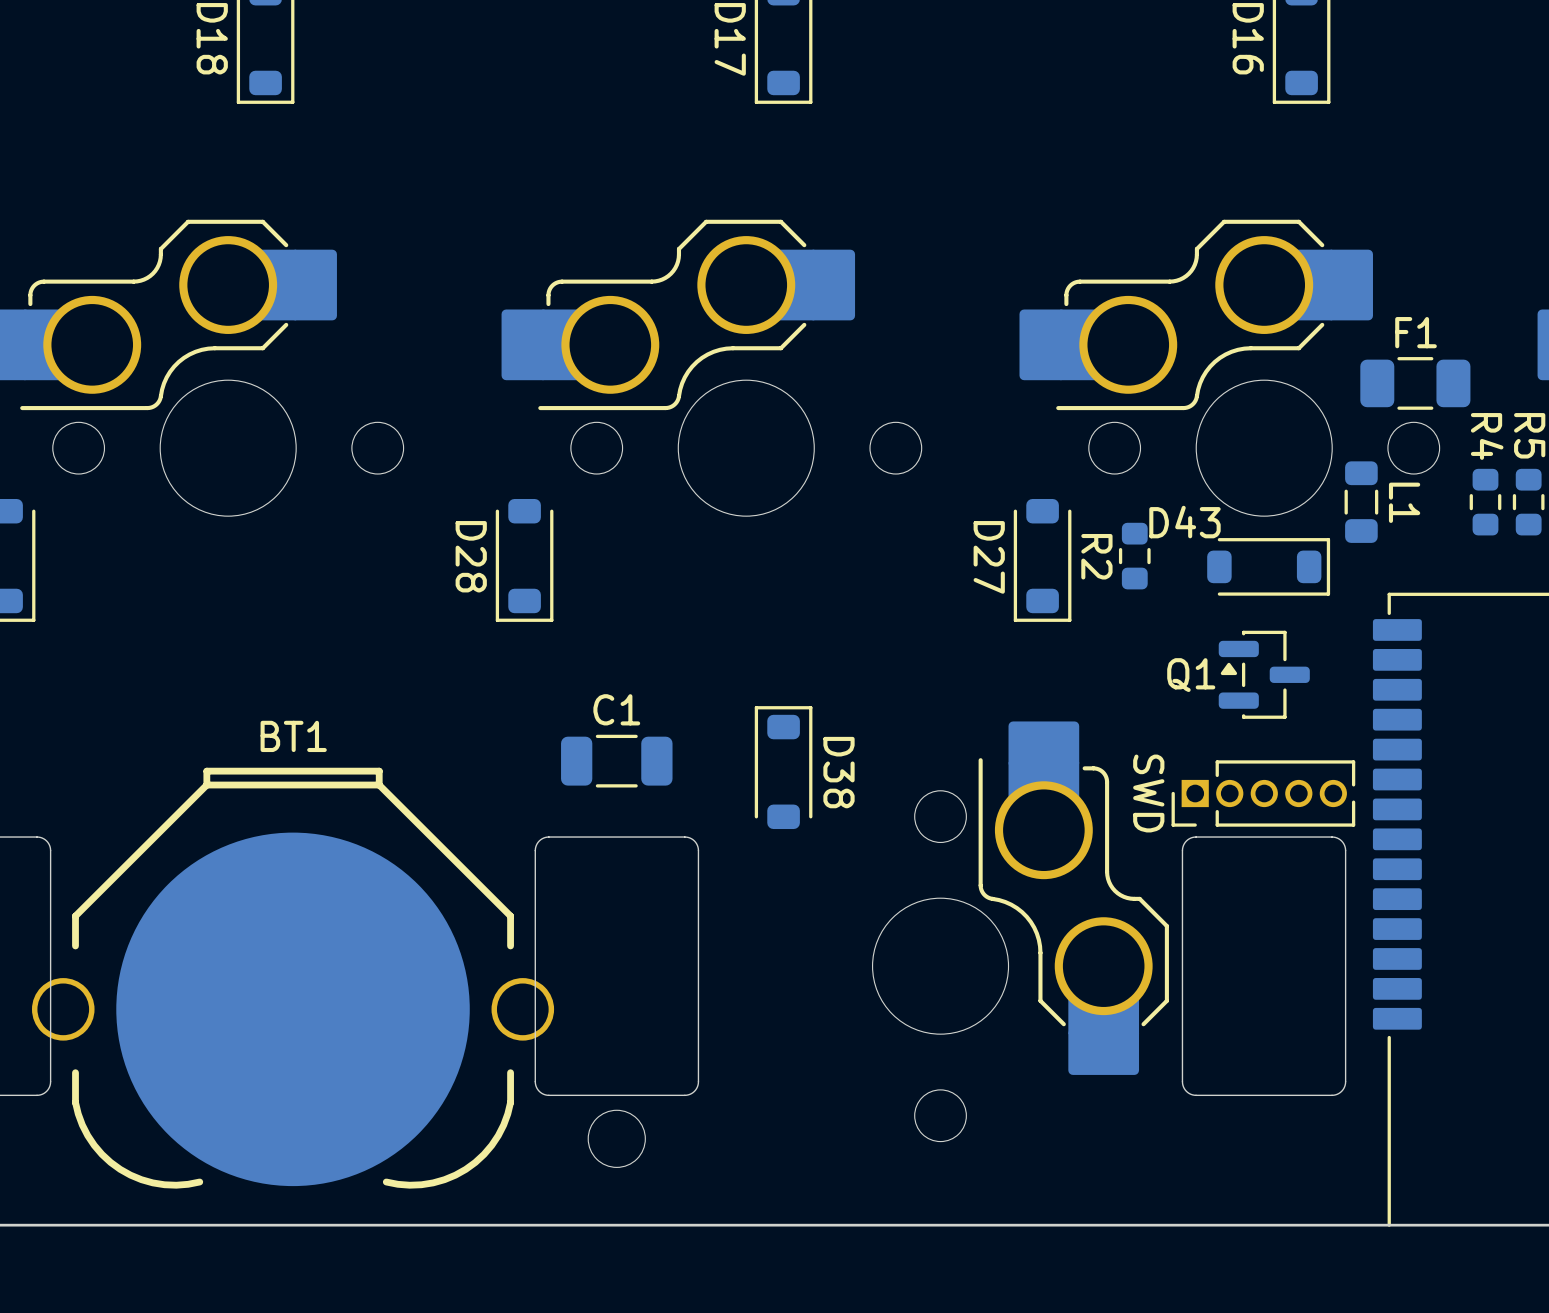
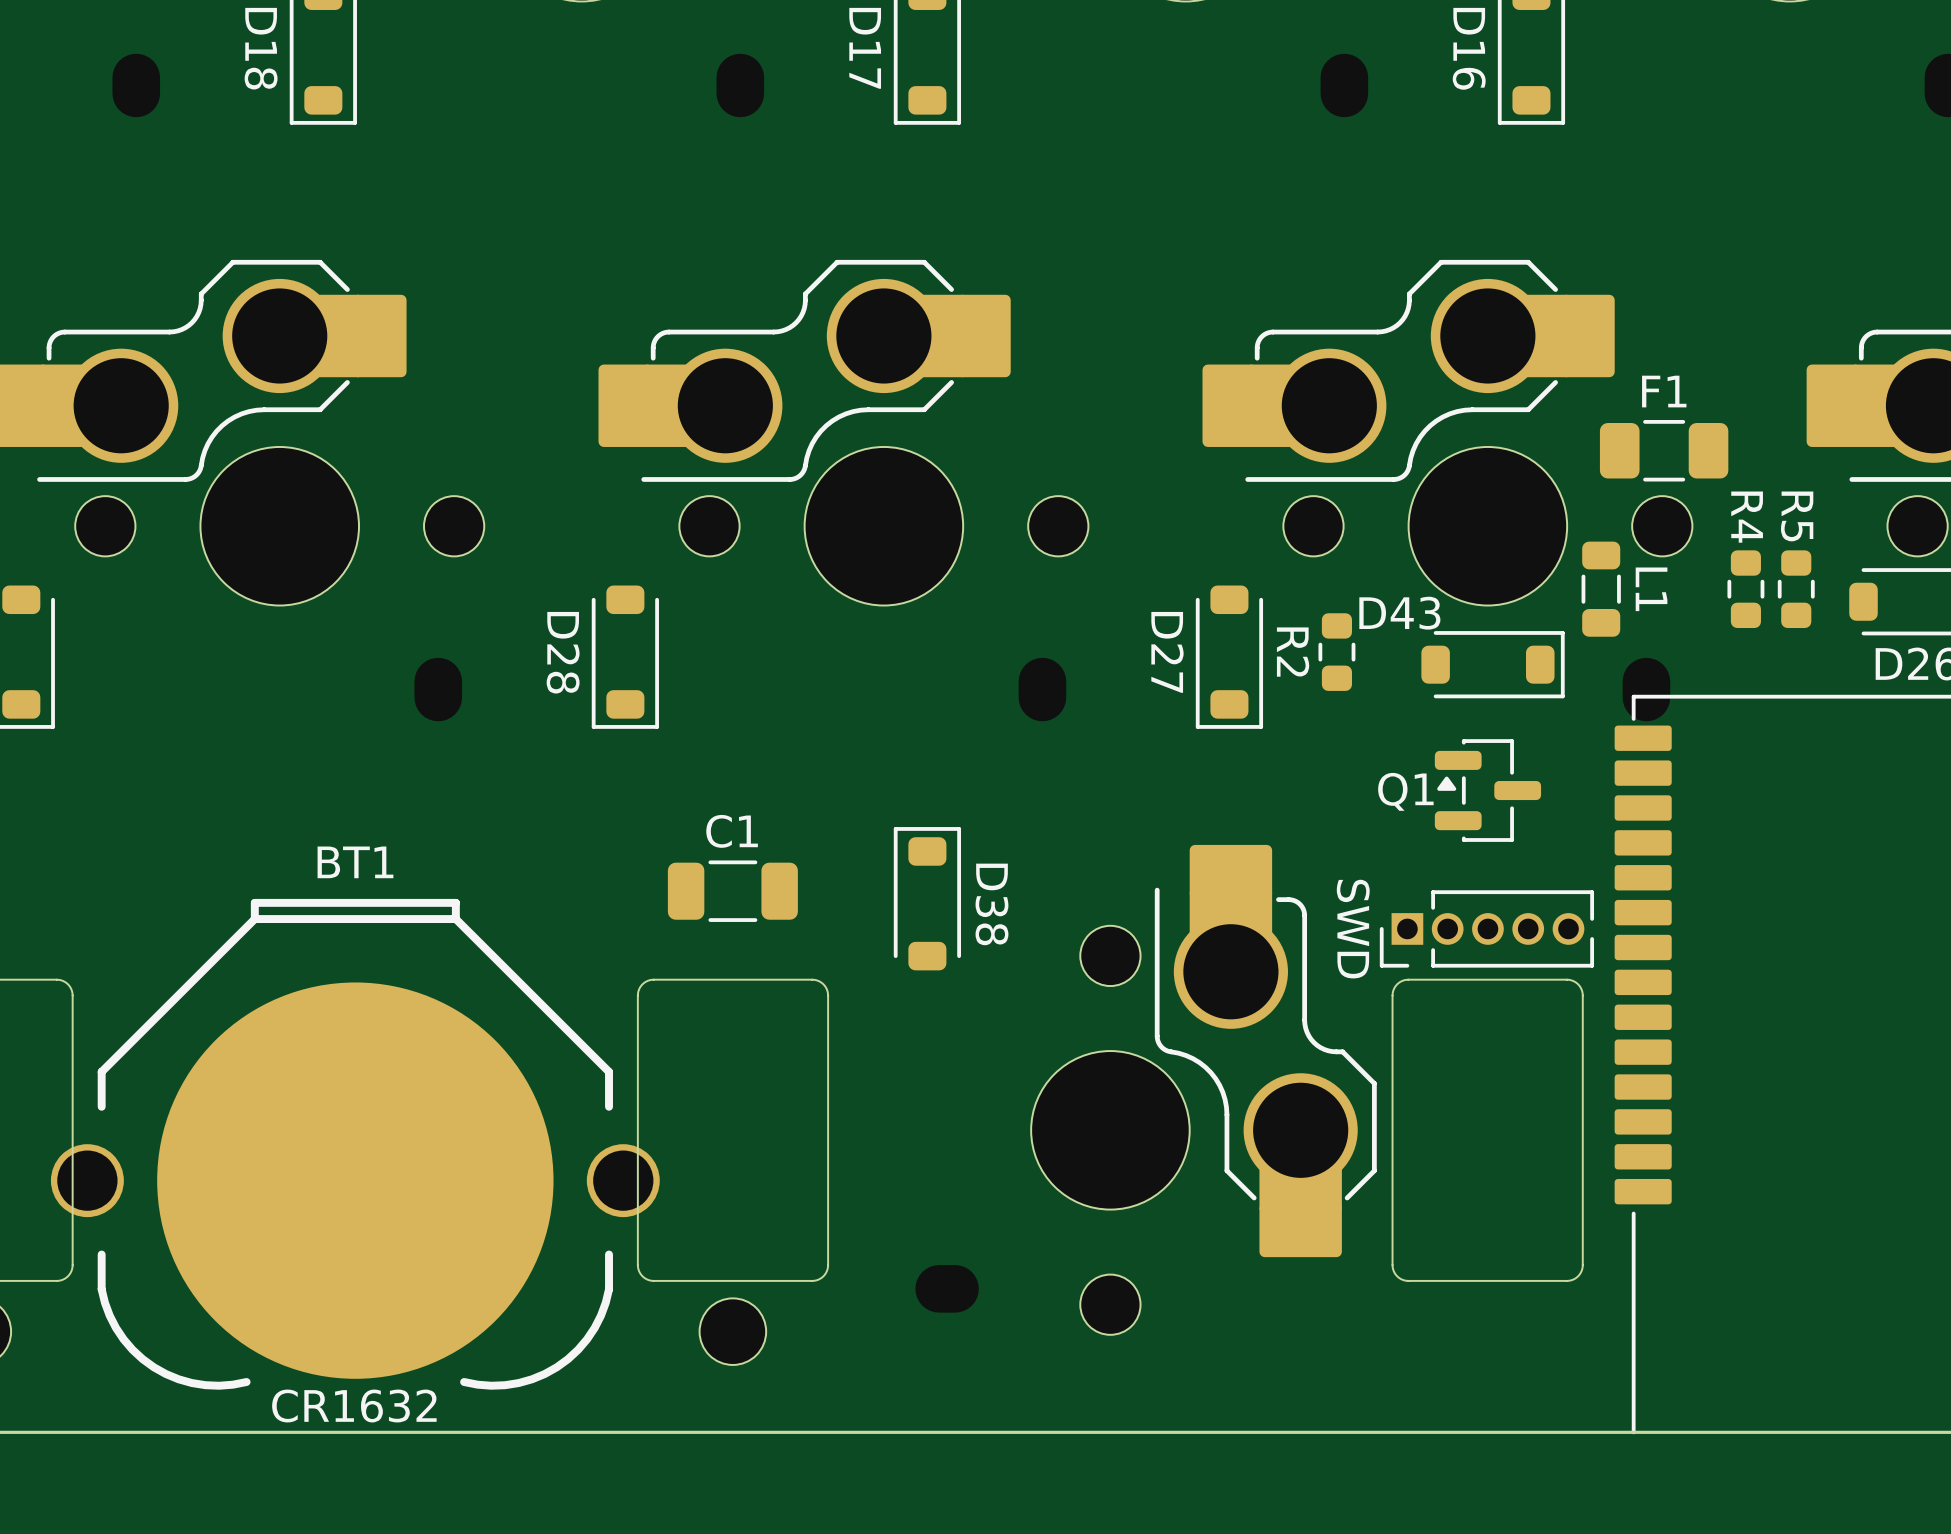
BT1 footprint: [31, 767, 555, 1189] -> [50, 898, 660, 1390]
BT1 value: none -> CR1632 (354, 1406)

